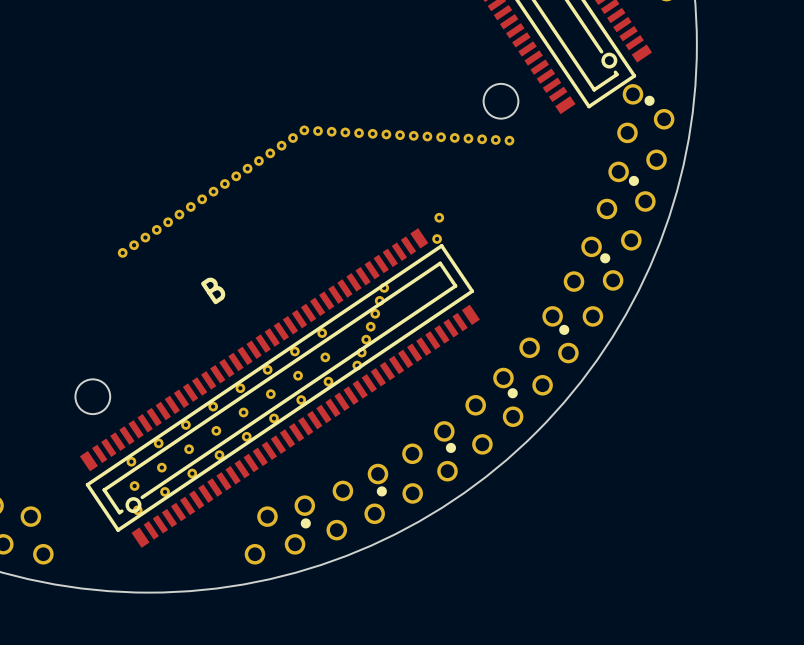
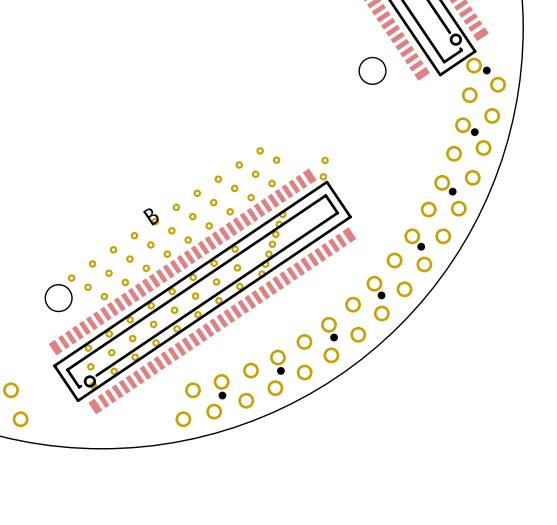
B: (297, 336) -> none
B: none -> (202, 280)

